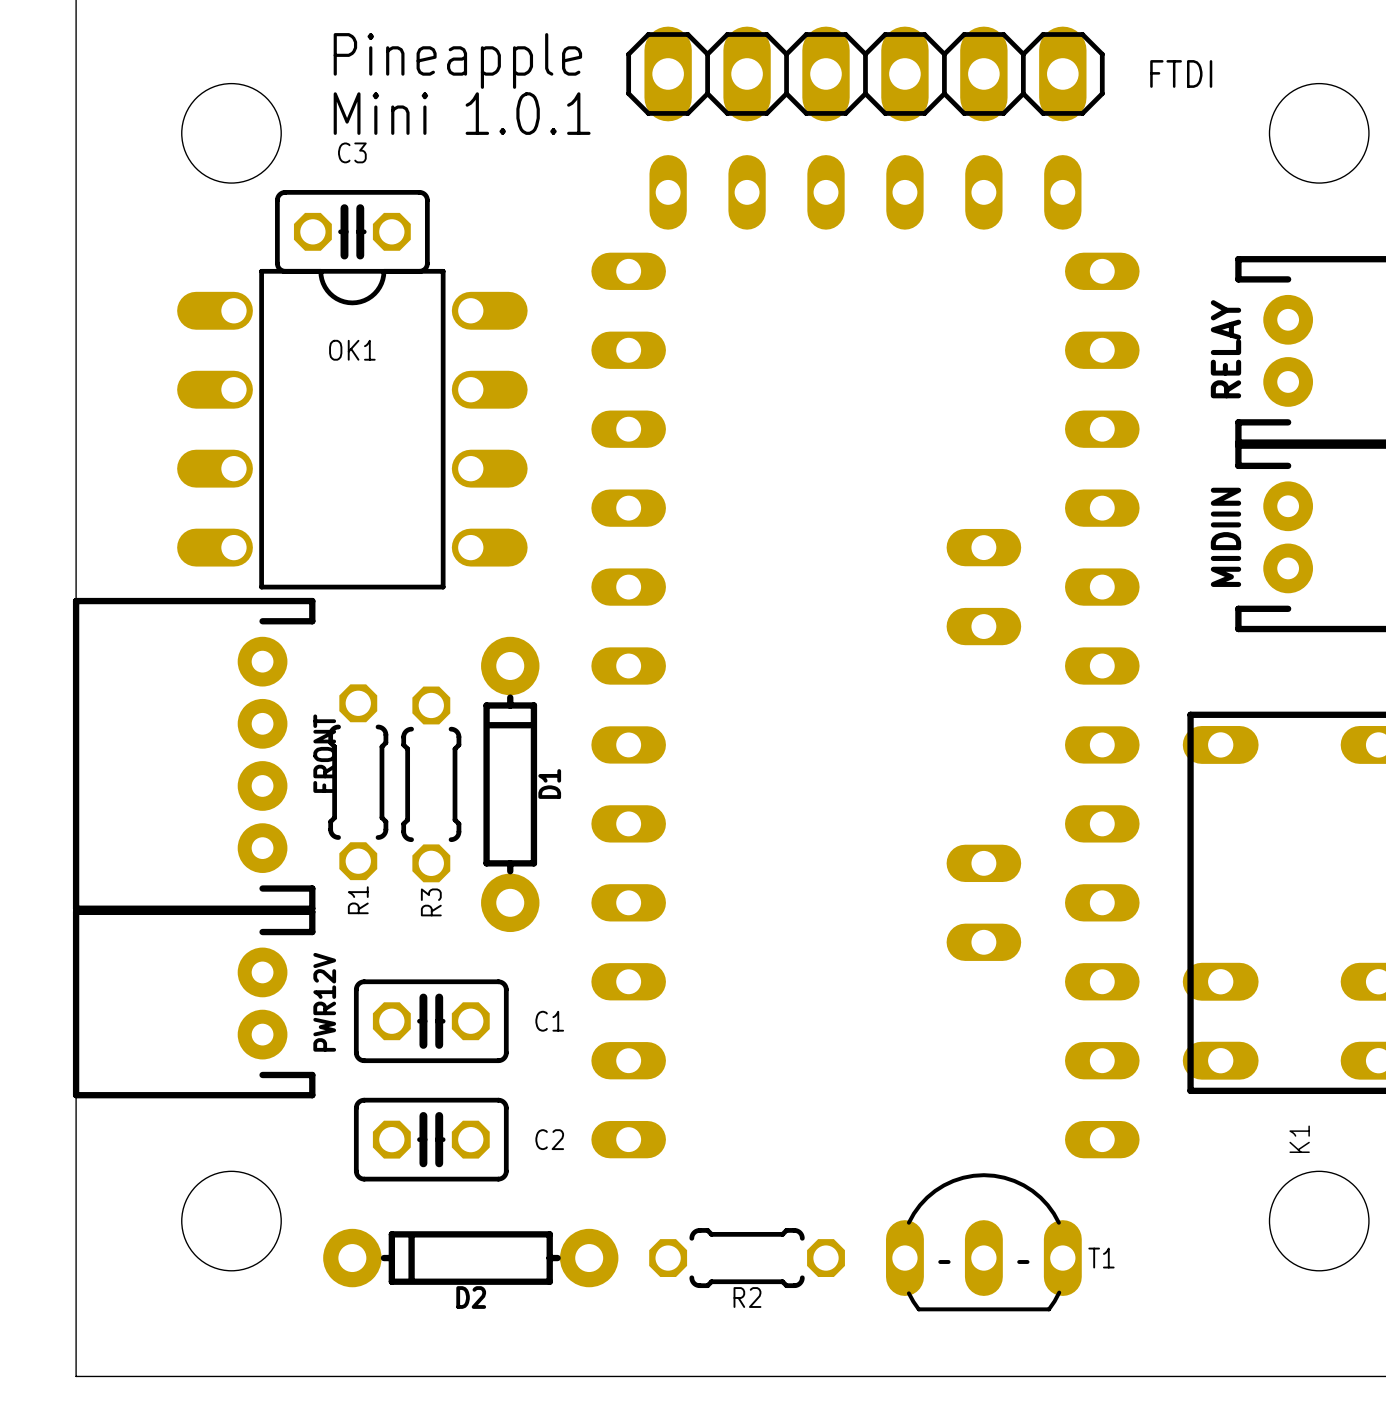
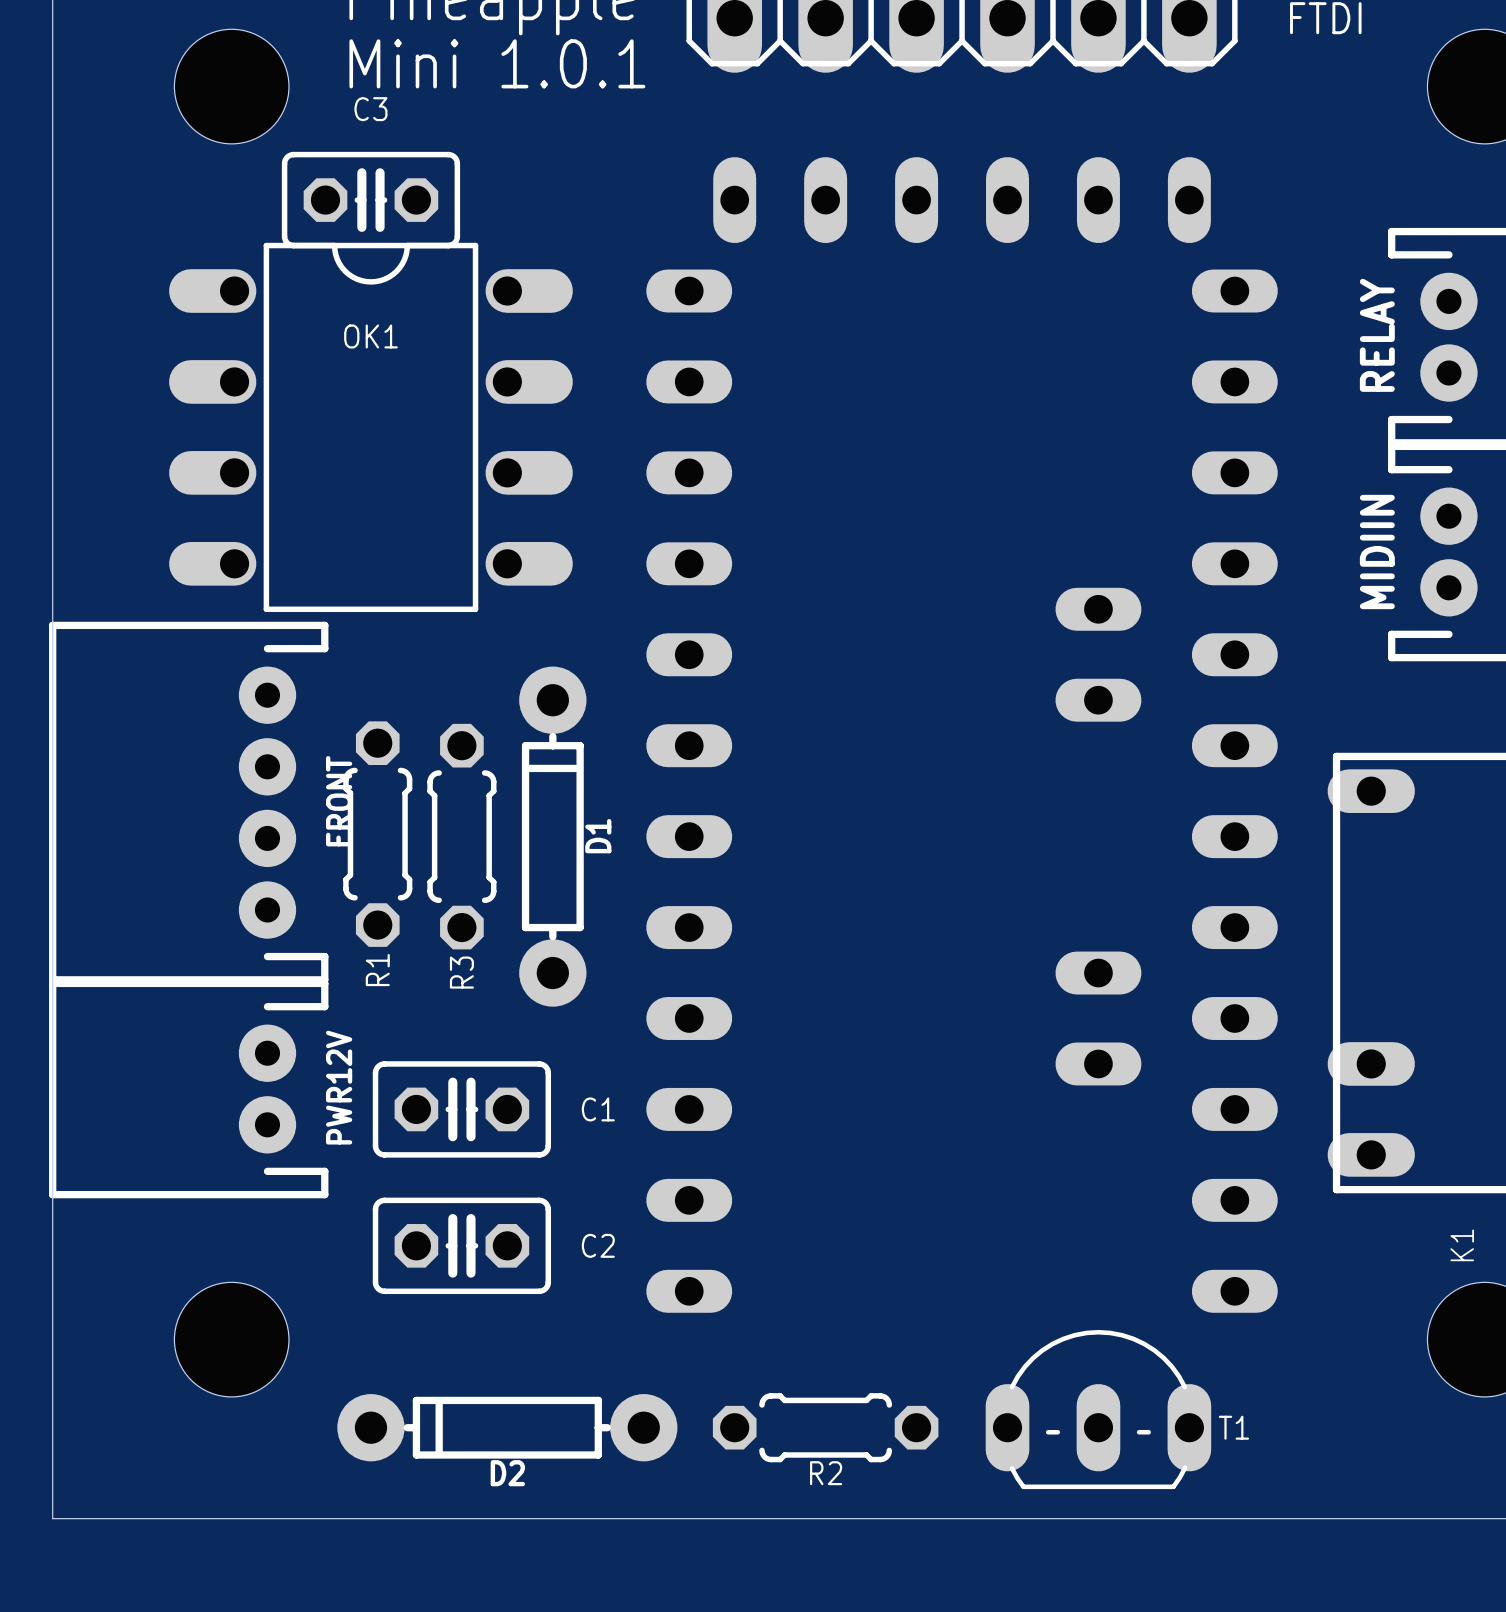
part position: (865, 656) -> (962, 734)
T1 position: (983, 1242) -> (1098, 1409)
D2 position: (470, 1258) -> (507, 1427)
R2 position: (747, 1258) -> (825, 1427)

